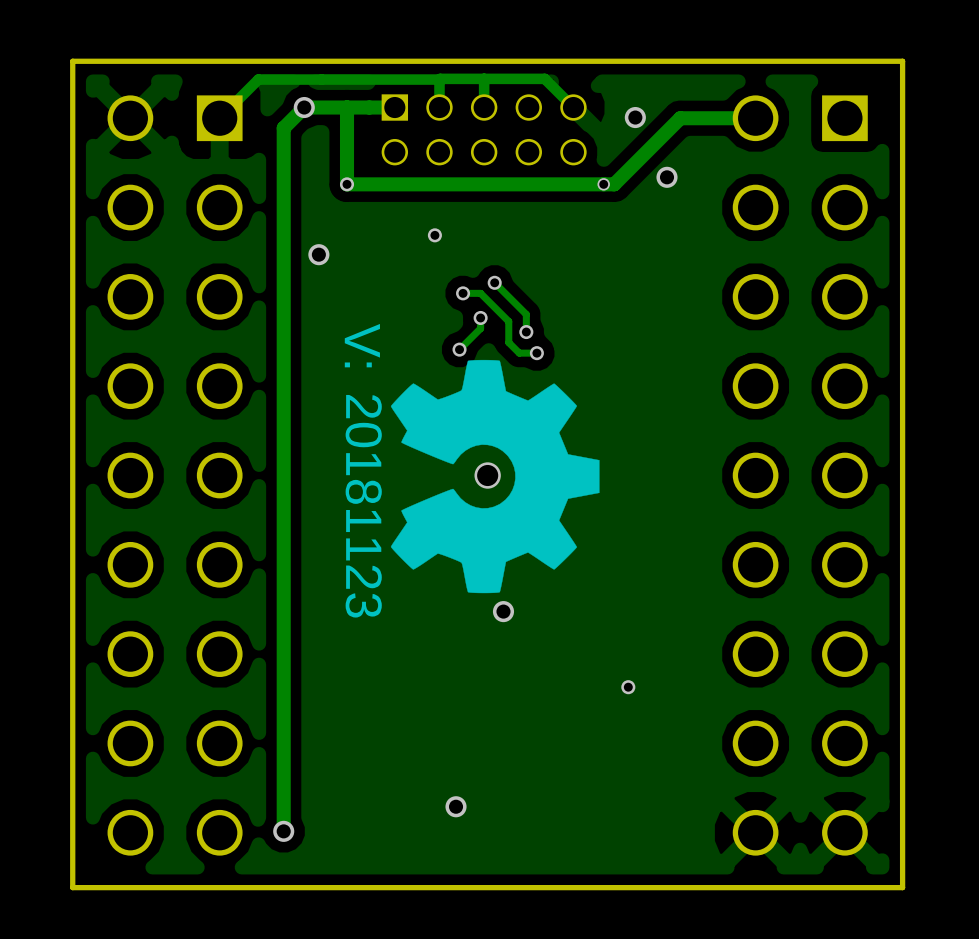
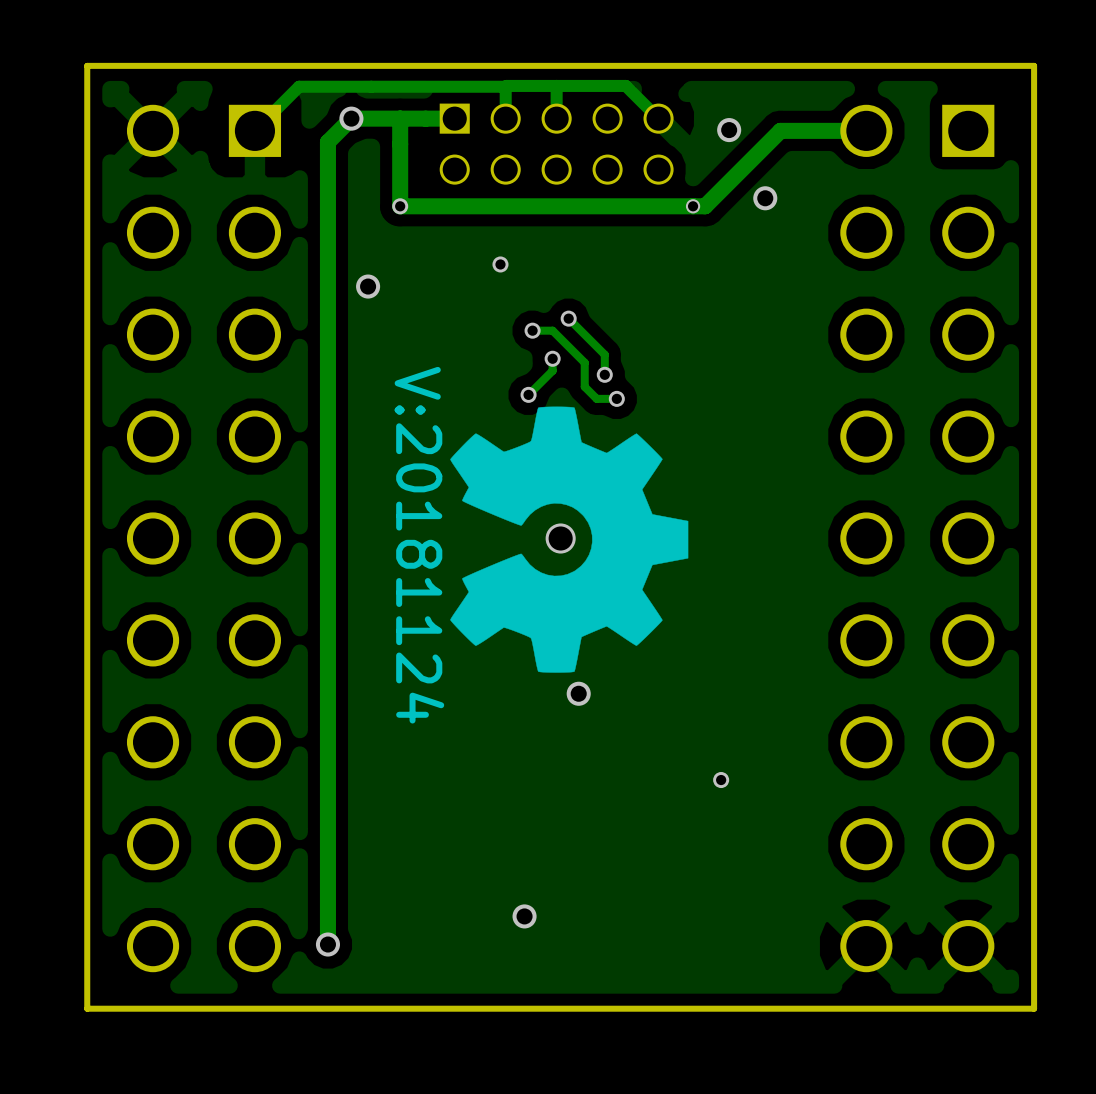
drawing shape: [344, 323, 382, 618] -> [394, 366, 445, 724]

